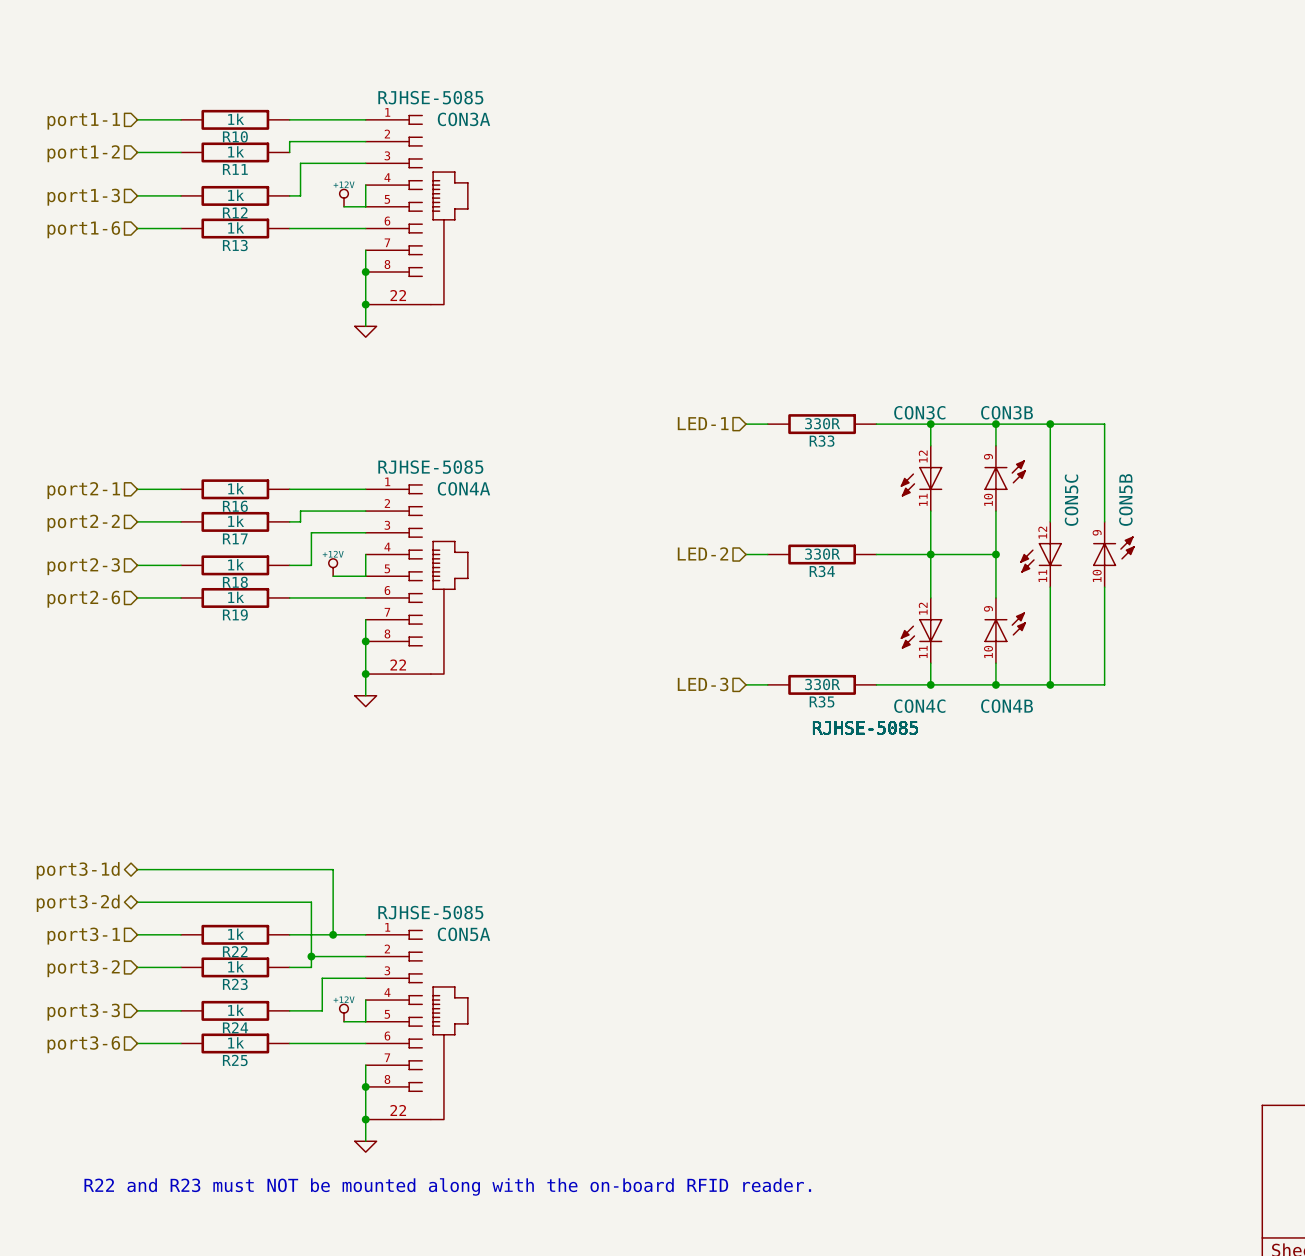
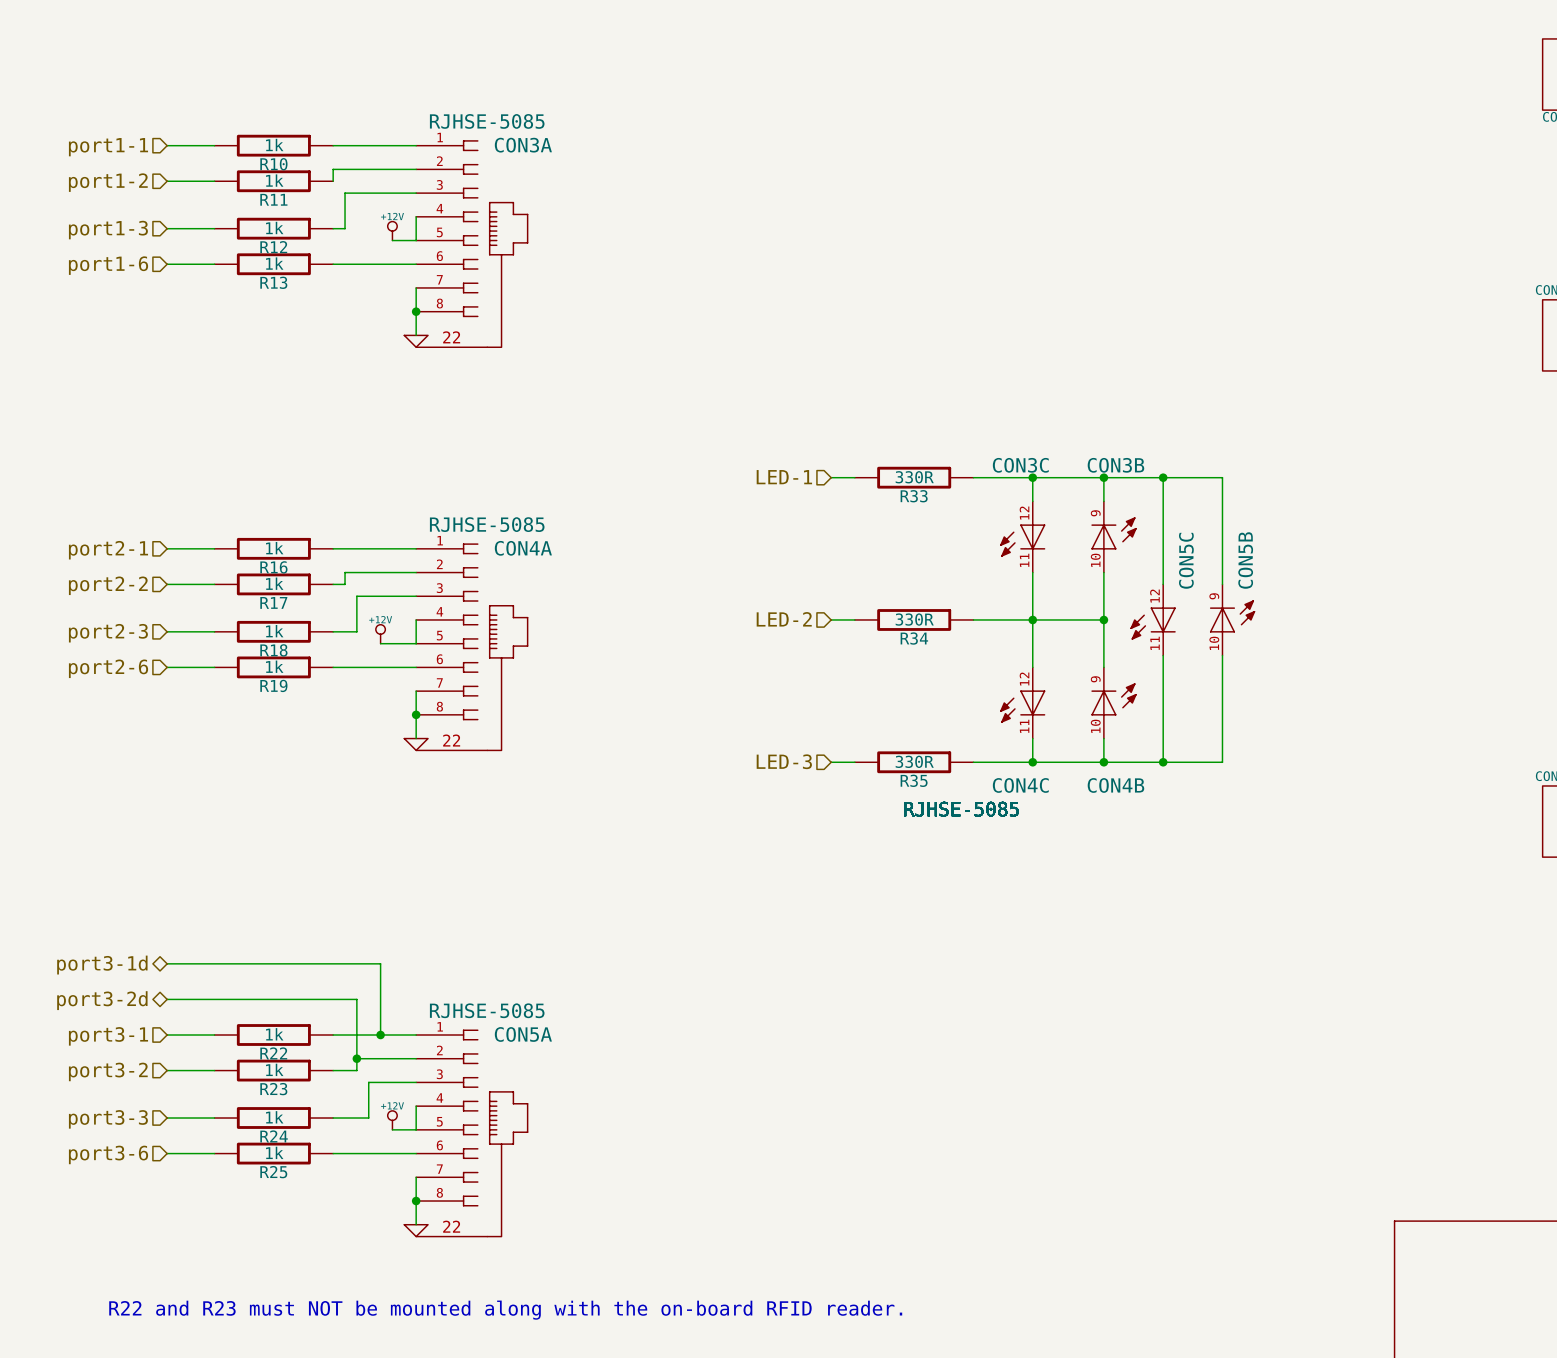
wire: (365, 293) (365, 326) -> none
junction: (365, 304) -> none
power symbol position: (365, 331) -> (416, 341)
wire: (365, 663) (365, 695) -> none
junction: (365, 674) -> none
power symbol position: (365, 701) -> (416, 744)
wire: (365, 1108) (365, 1141) -> none
junction: (365, 1119) -> none
power symbol position: (365, 1146) -> (416, 1230)

